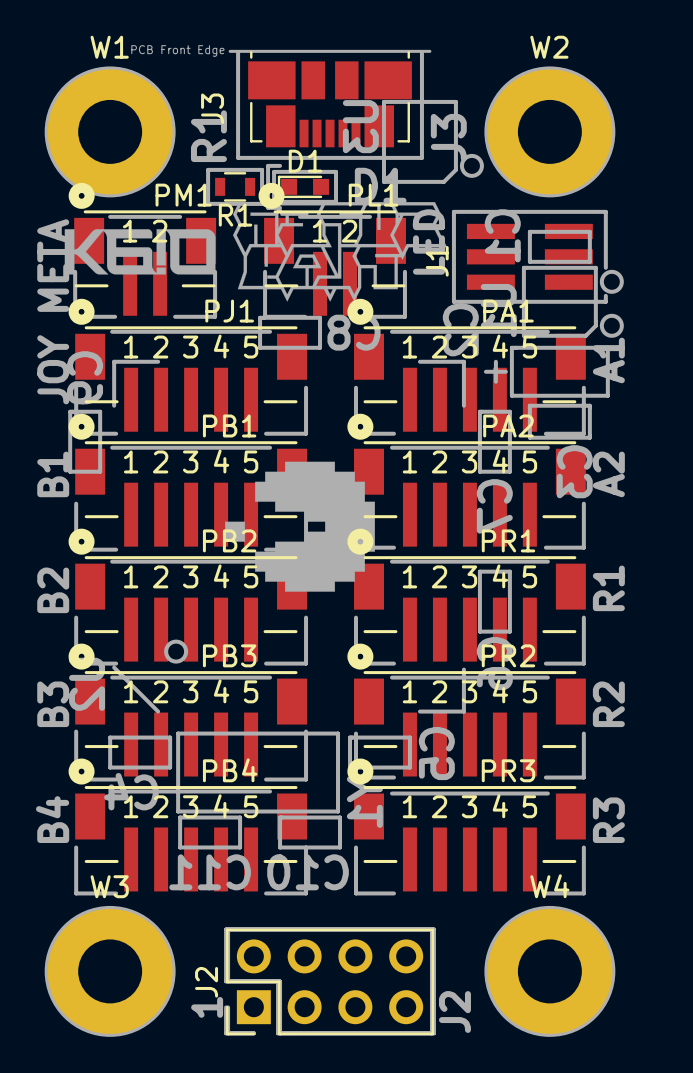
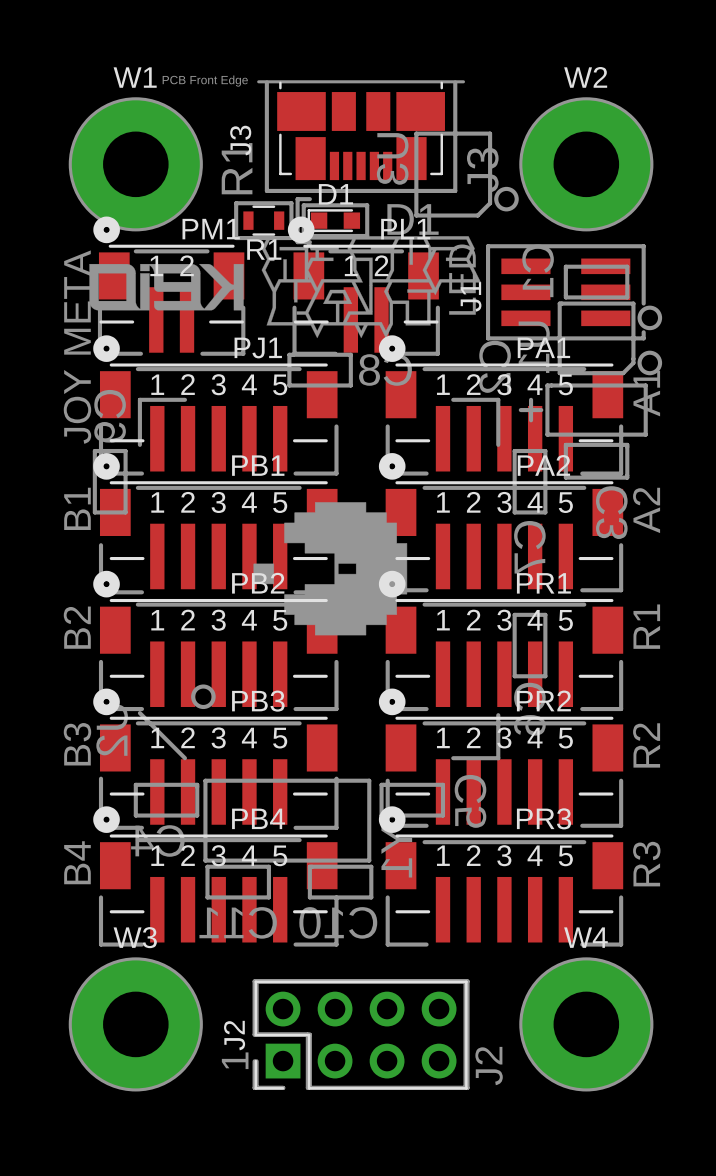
drawing shape: [64, 229, 216, 275] -> [89, 263, 244, 311]

